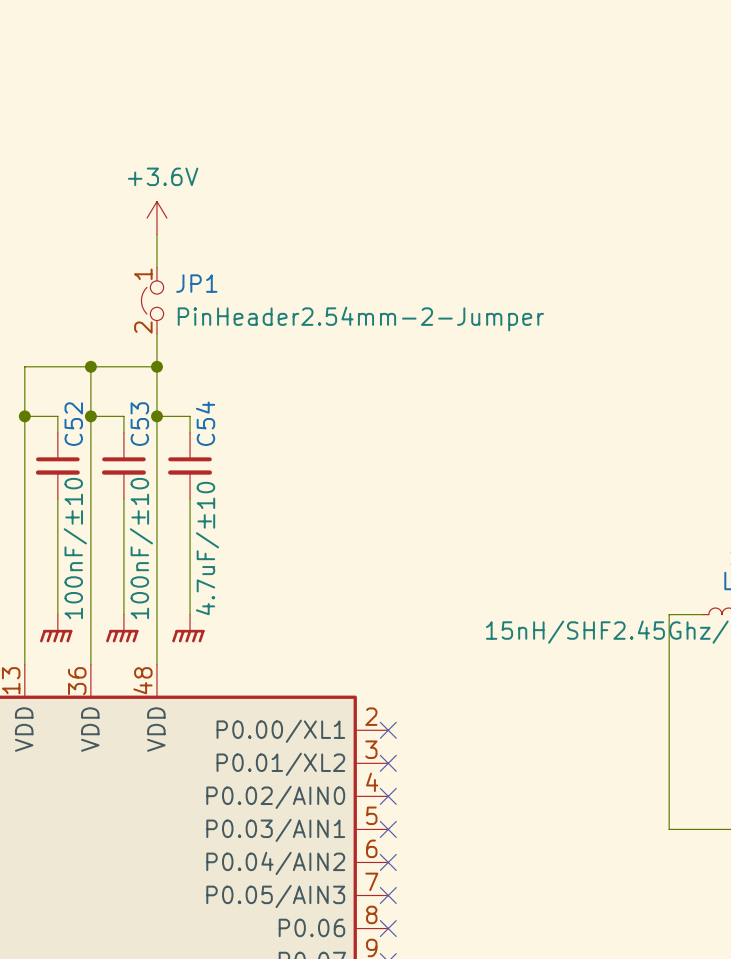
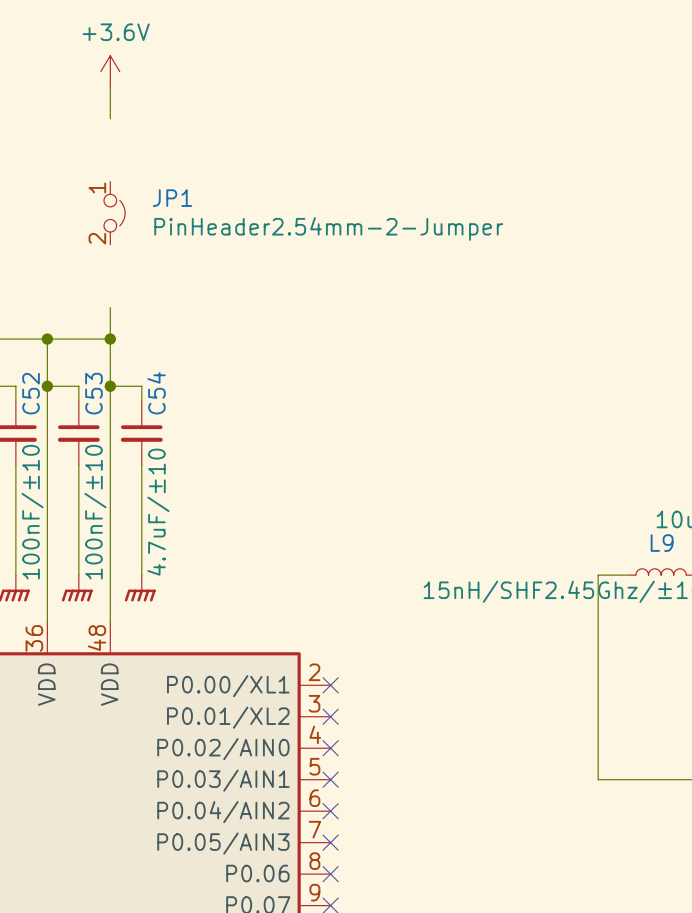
power symbol position: +3.6V (156, 218) -> +3.6V (110, 71)
wire: (156, 234) (156, 267) -> (110, 87) (110, 118)
JP1 flip: as is (152, 300) -> left-right (114, 213)
JP1 position: (152, 300) -> (114, 213)

